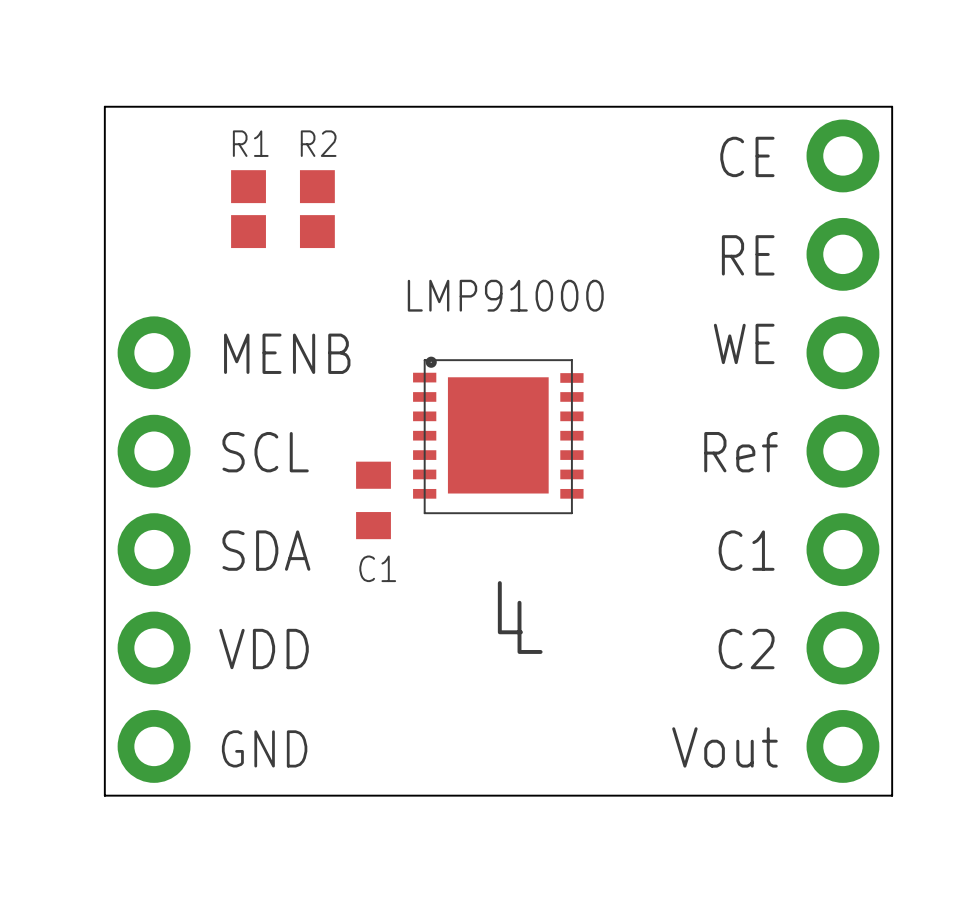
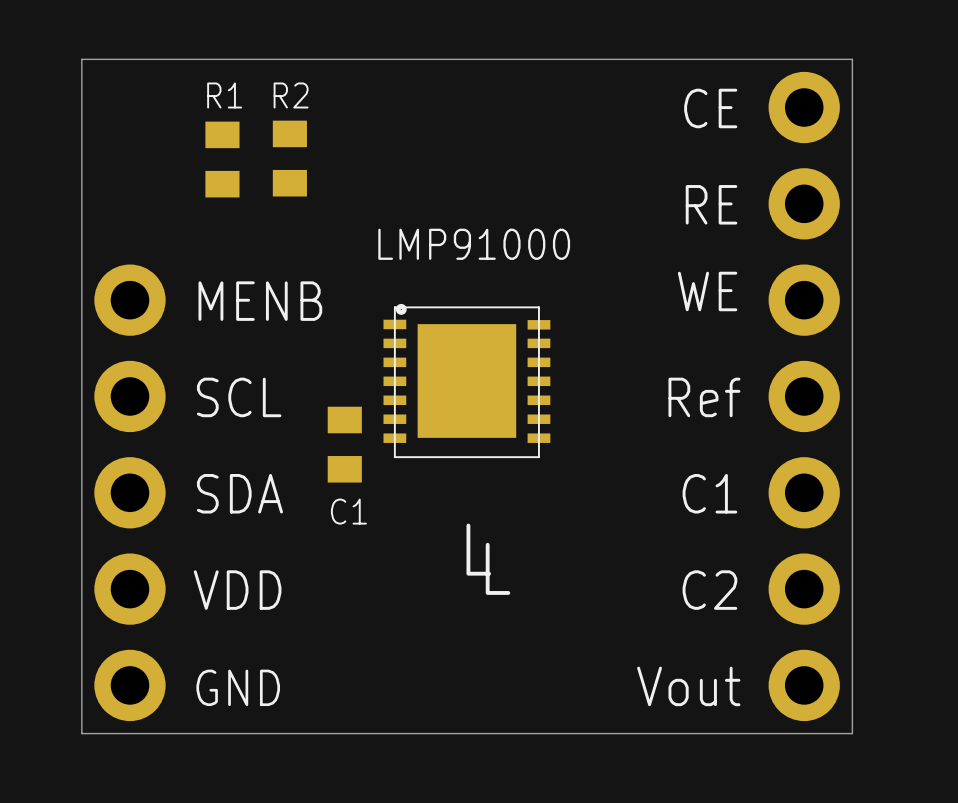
R1 footprint: [231, 170, 266, 249] -> [205, 121, 240, 198]
R2 footprint: [299, 170, 335, 249] -> [272, 120, 307, 197]

